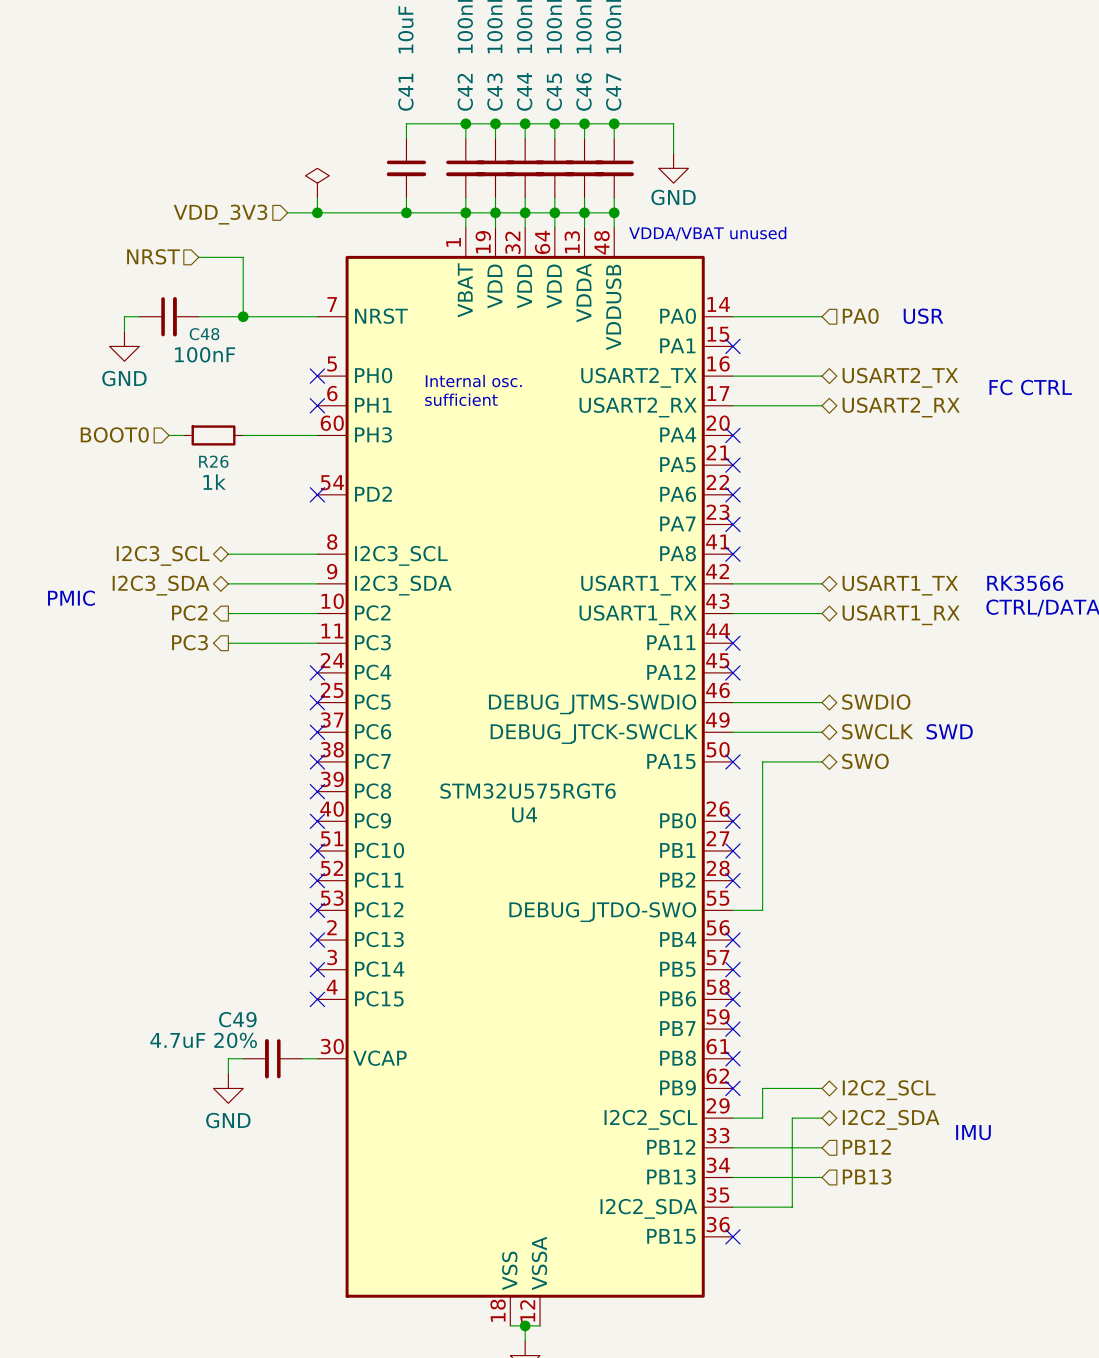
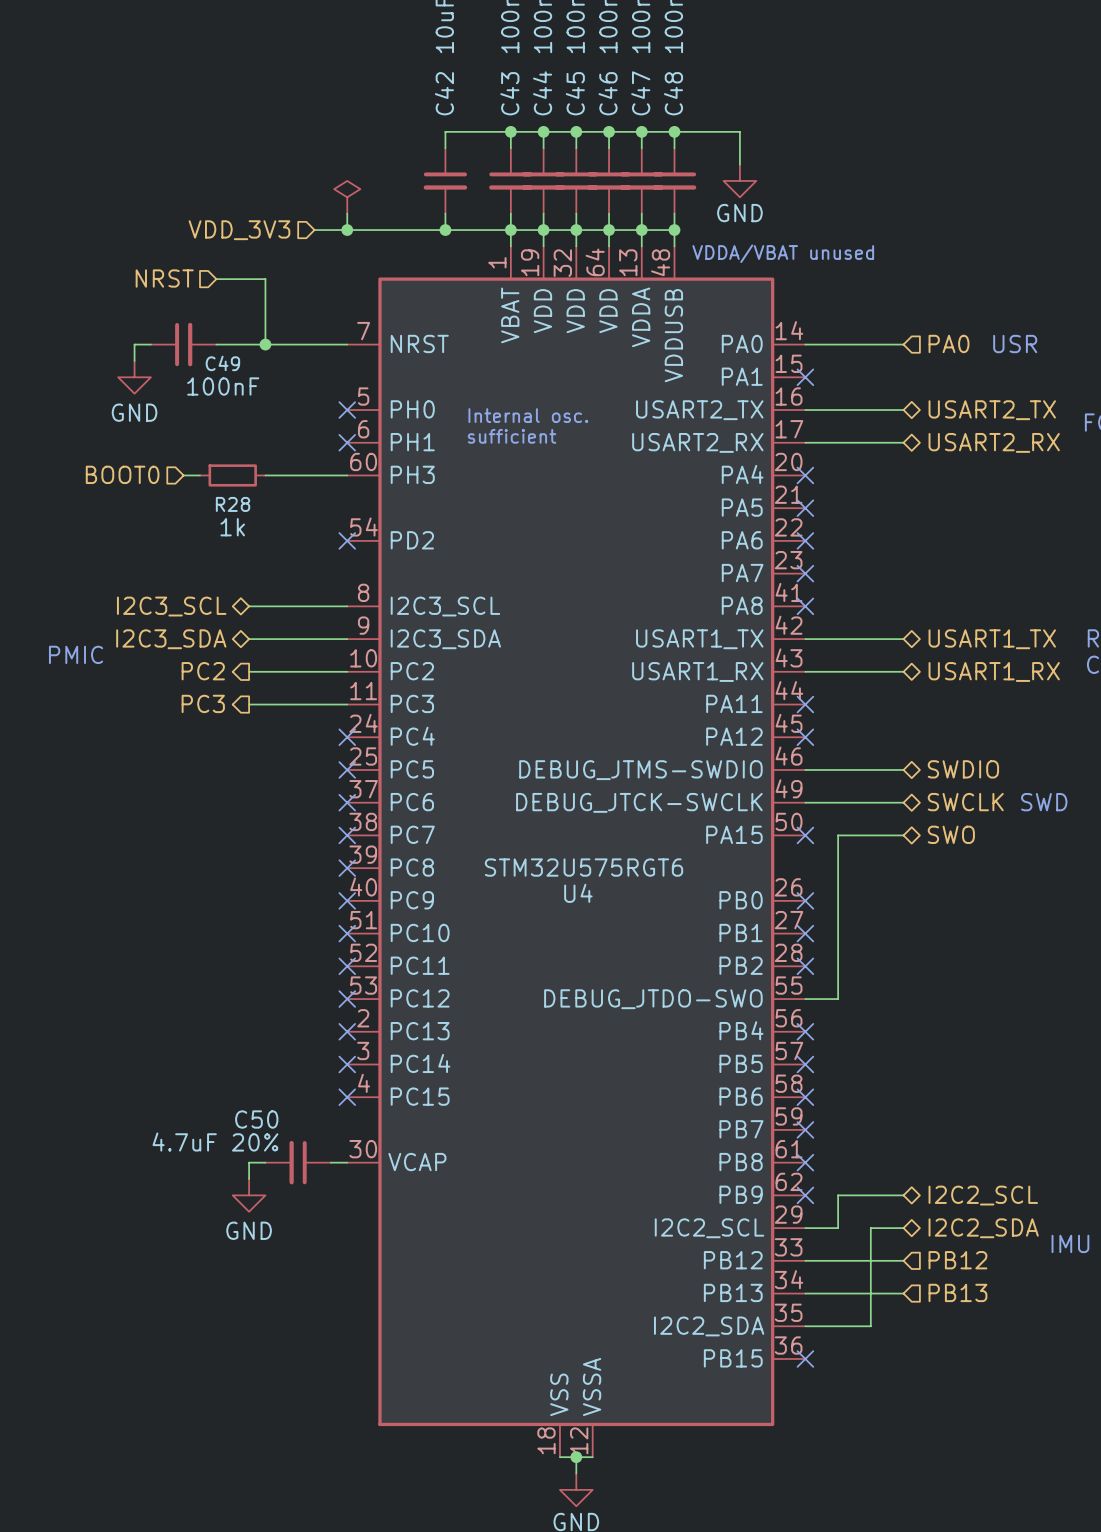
C44 name: C44 (524, 91) -> C45 (575, 93)
C46 name: C46 (583, 91) -> C47 (640, 93)
C41 name: C41 (405, 92) -> C42 (444, 93)
C42 name: C42 (465, 92) -> C43 (509, 93)
C43 name: C43 (494, 92) -> C44 (542, 93)
C45 name: C45 (554, 92) -> C46 (608, 93)
C47 name: C47 (613, 92) -> C48 (673, 93)
C48 name: C48 (204, 334) -> C49 (222, 363)
R26 name: R26 (213, 461) -> R28 (233, 504)
C49 name: C49 (237, 1019) -> C50 (256, 1119)

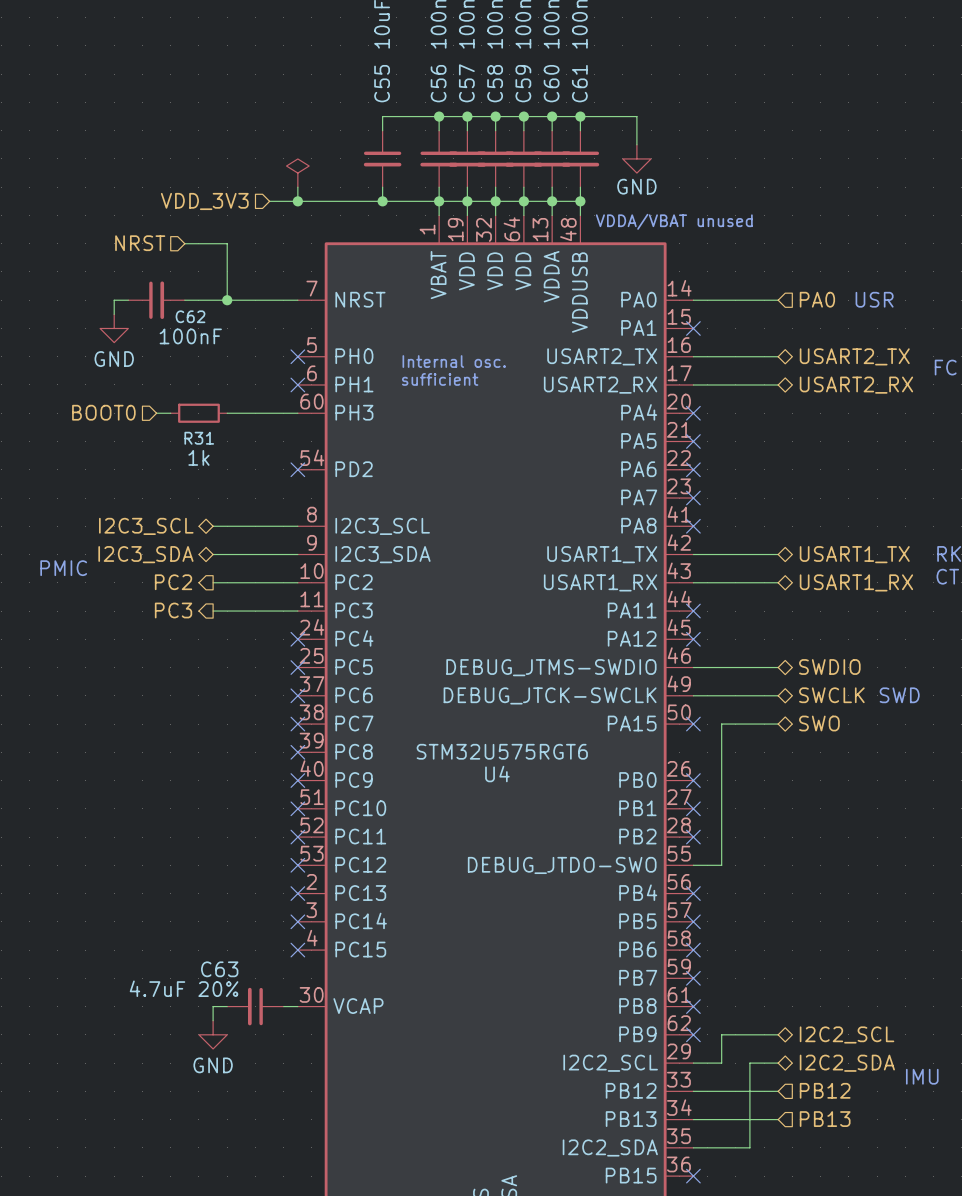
C42 name: C42 (444, 93) -> C55 (382, 83)
C43 name: C43 (509, 93) -> C56 (438, 83)
C44 name: C44 (542, 93) -> C57 (466, 83)
C45 name: C45 (575, 93) -> C58 (495, 83)
C46 name: C46 (608, 93) -> C59 (523, 83)
C47 name: C47 (640, 93) -> C60 (551, 83)
C48 name: C48 (673, 93) -> C61 (579, 83)
C49 name: C49 (222, 363) -> C62 (190, 316)
R28 name: R28 (233, 504) -> R31 (199, 438)
C50 name: C50 (256, 1119) -> C63 (219, 969)

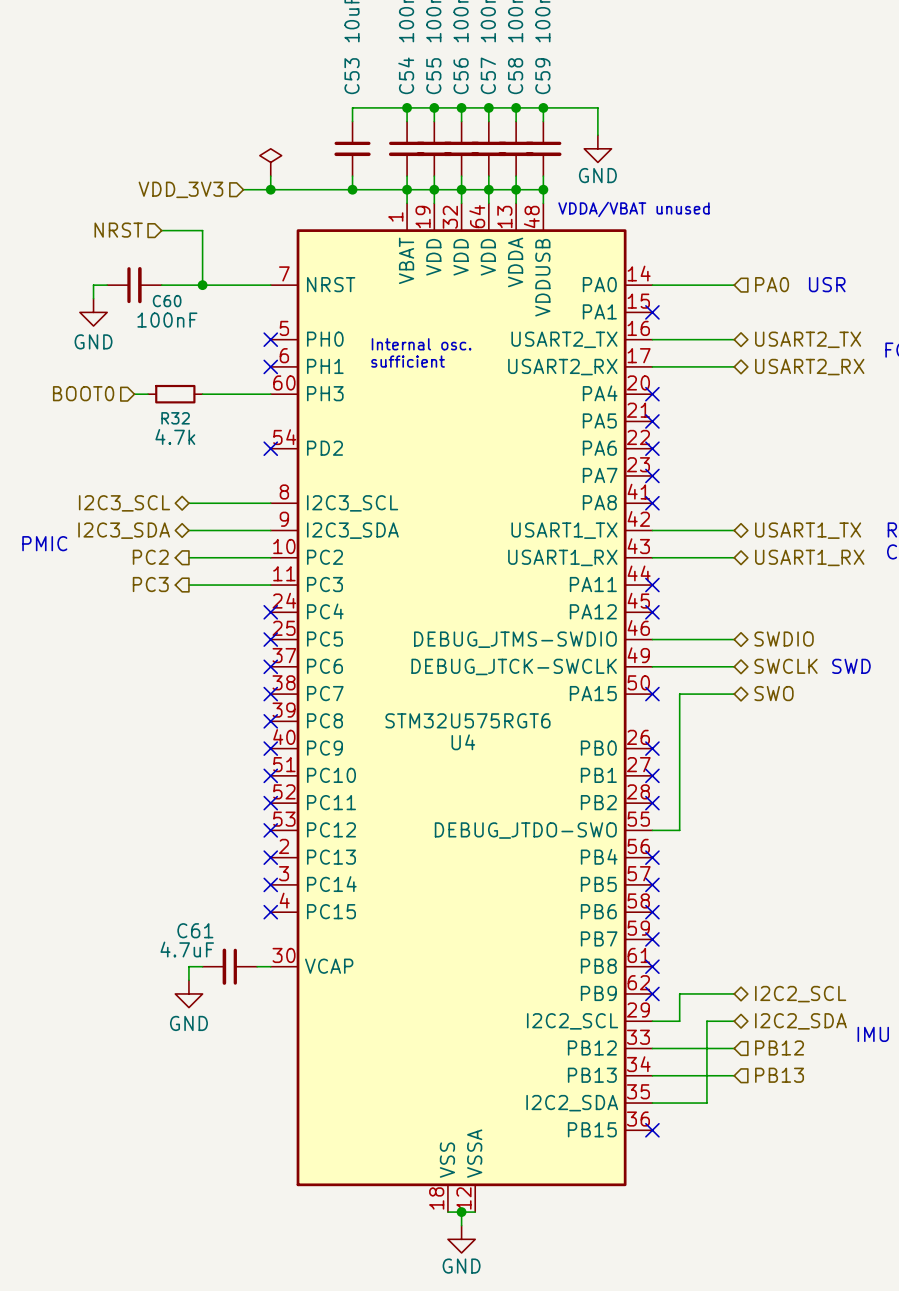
C55 name: C55 (382, 83) -> C53 (352, 76)
C56 name: C56 (438, 83) -> C54 (406, 75)
C57 name: C57 (466, 83) -> C55 (433, 76)
C58 name: C58 (495, 83) -> C56 (461, 76)
C59 name: C59 (523, 83) -> C57 (488, 75)
C60 name: C60 (551, 83) -> C58 (515, 76)
C61 name: C61 (579, 83) -> C59 (542, 76)
C62 name: C62 (190, 316) -> C60 (167, 301)
R31 name: R31 (199, 438) -> R32 (175, 418)
R31 value: 1k (198, 457) -> 4.7k (175, 436)
C63 name: C63 (219, 969) -> C61 (195, 930)
C63 value: 4.7uF 20% (184, 988) -> 4.7uF (187, 949)

